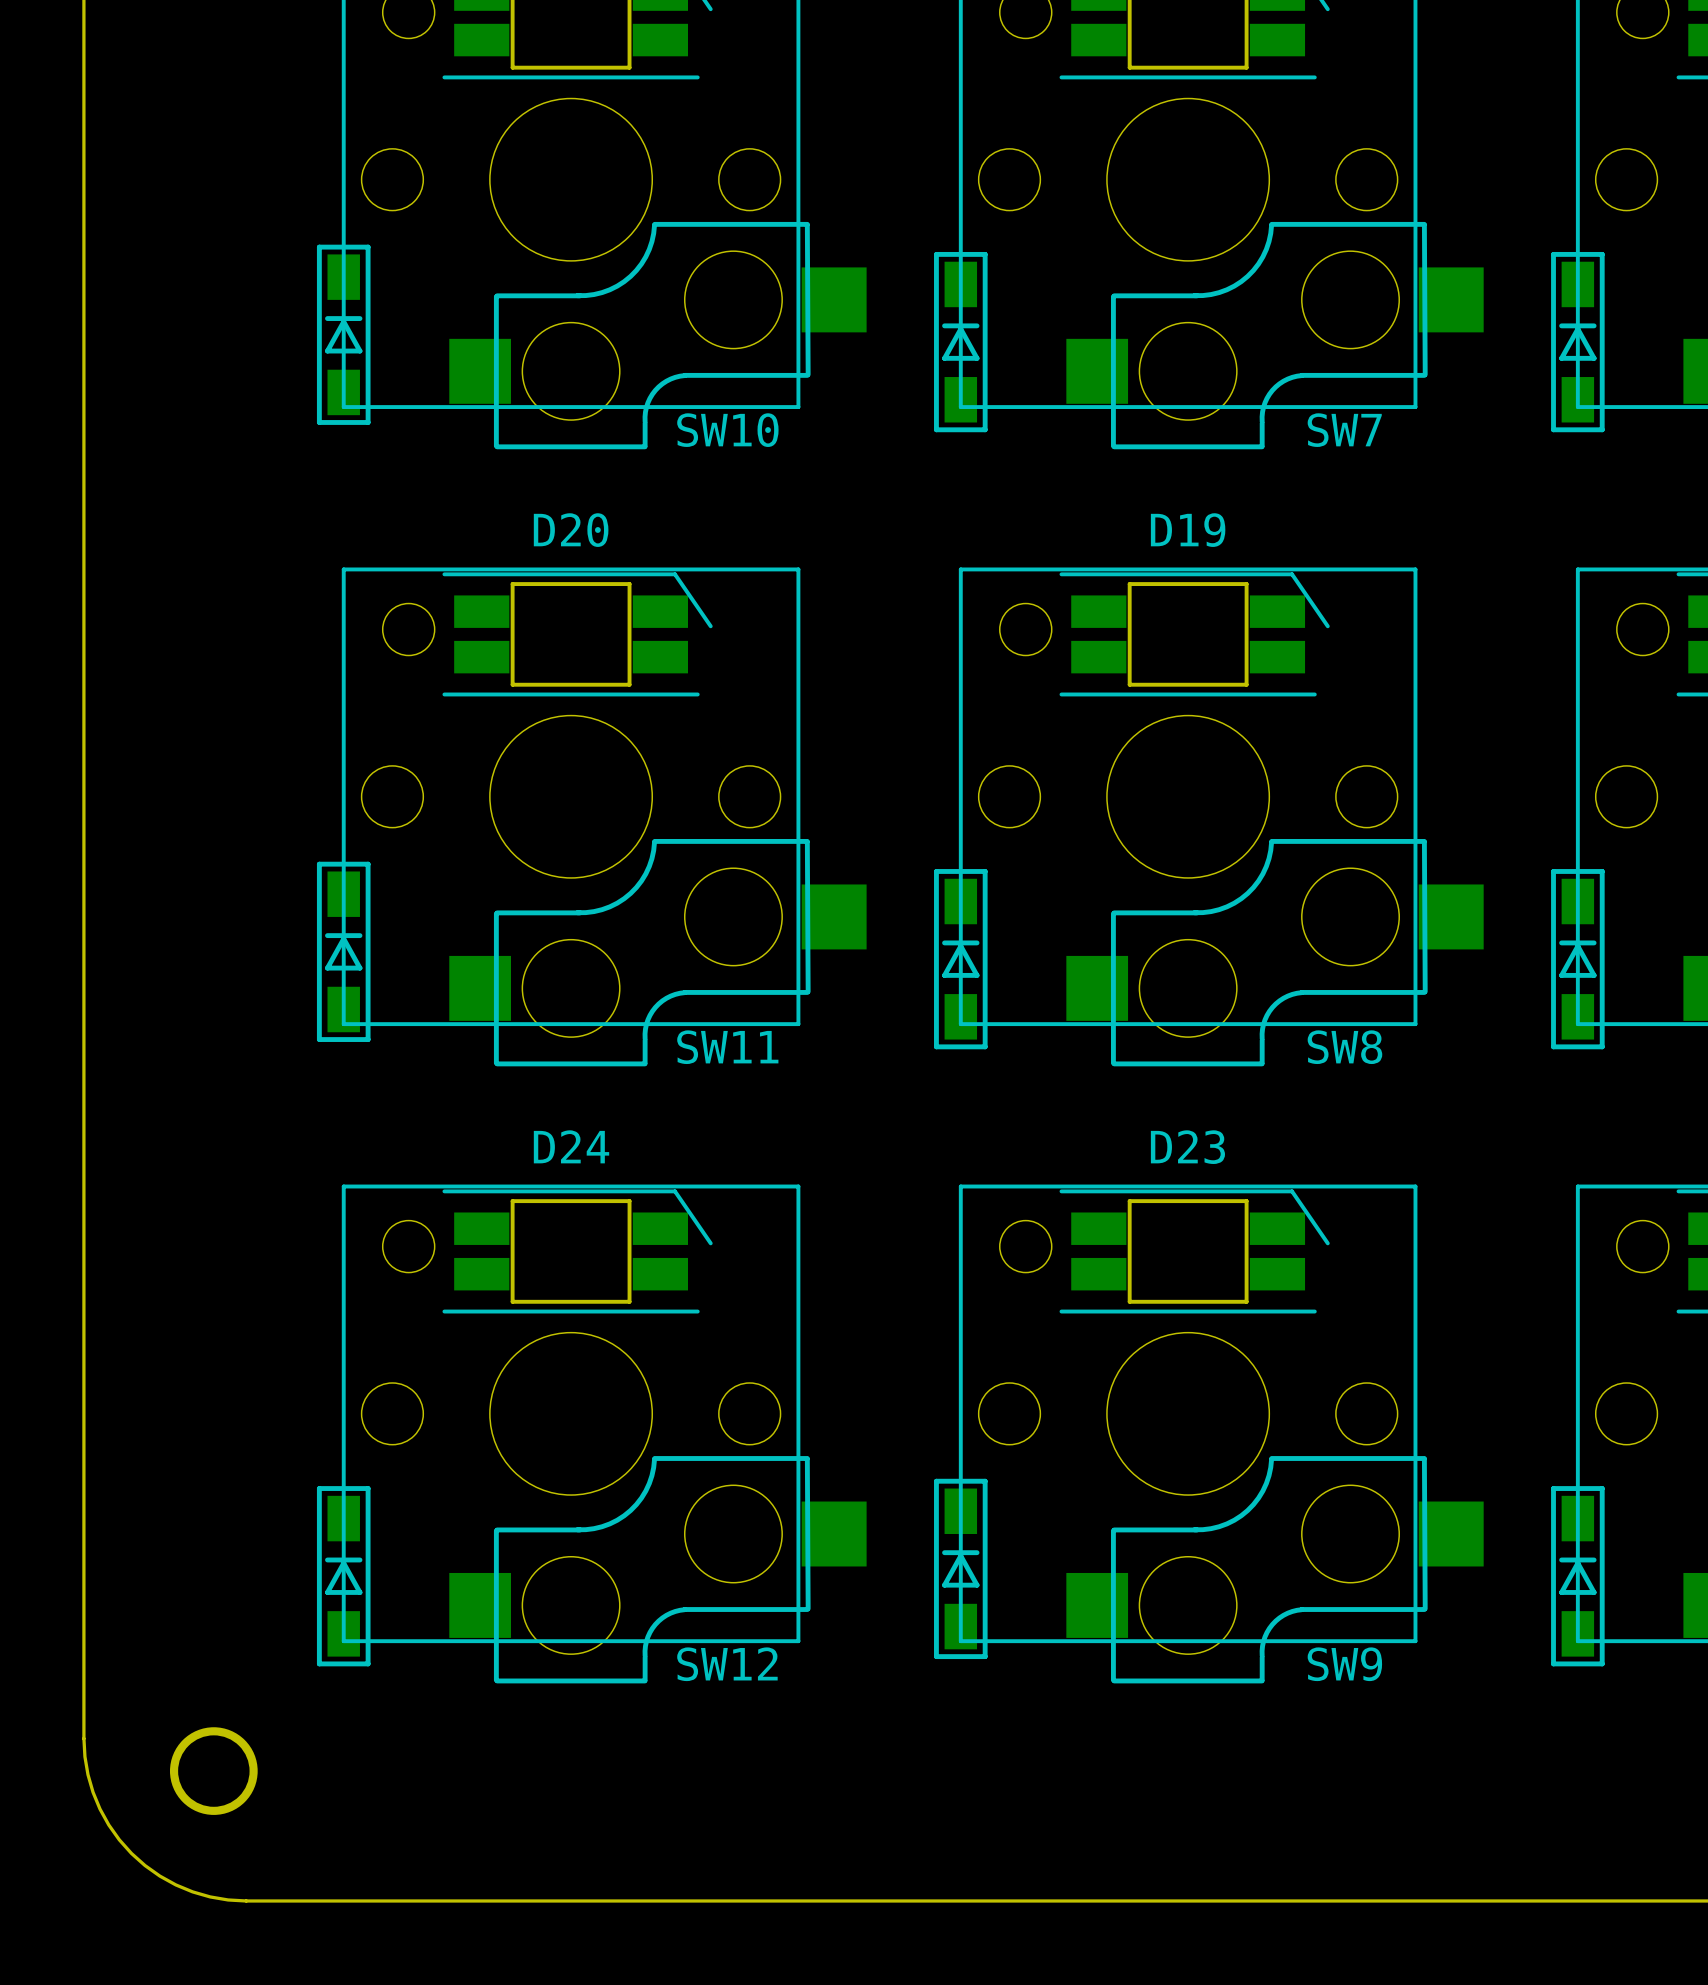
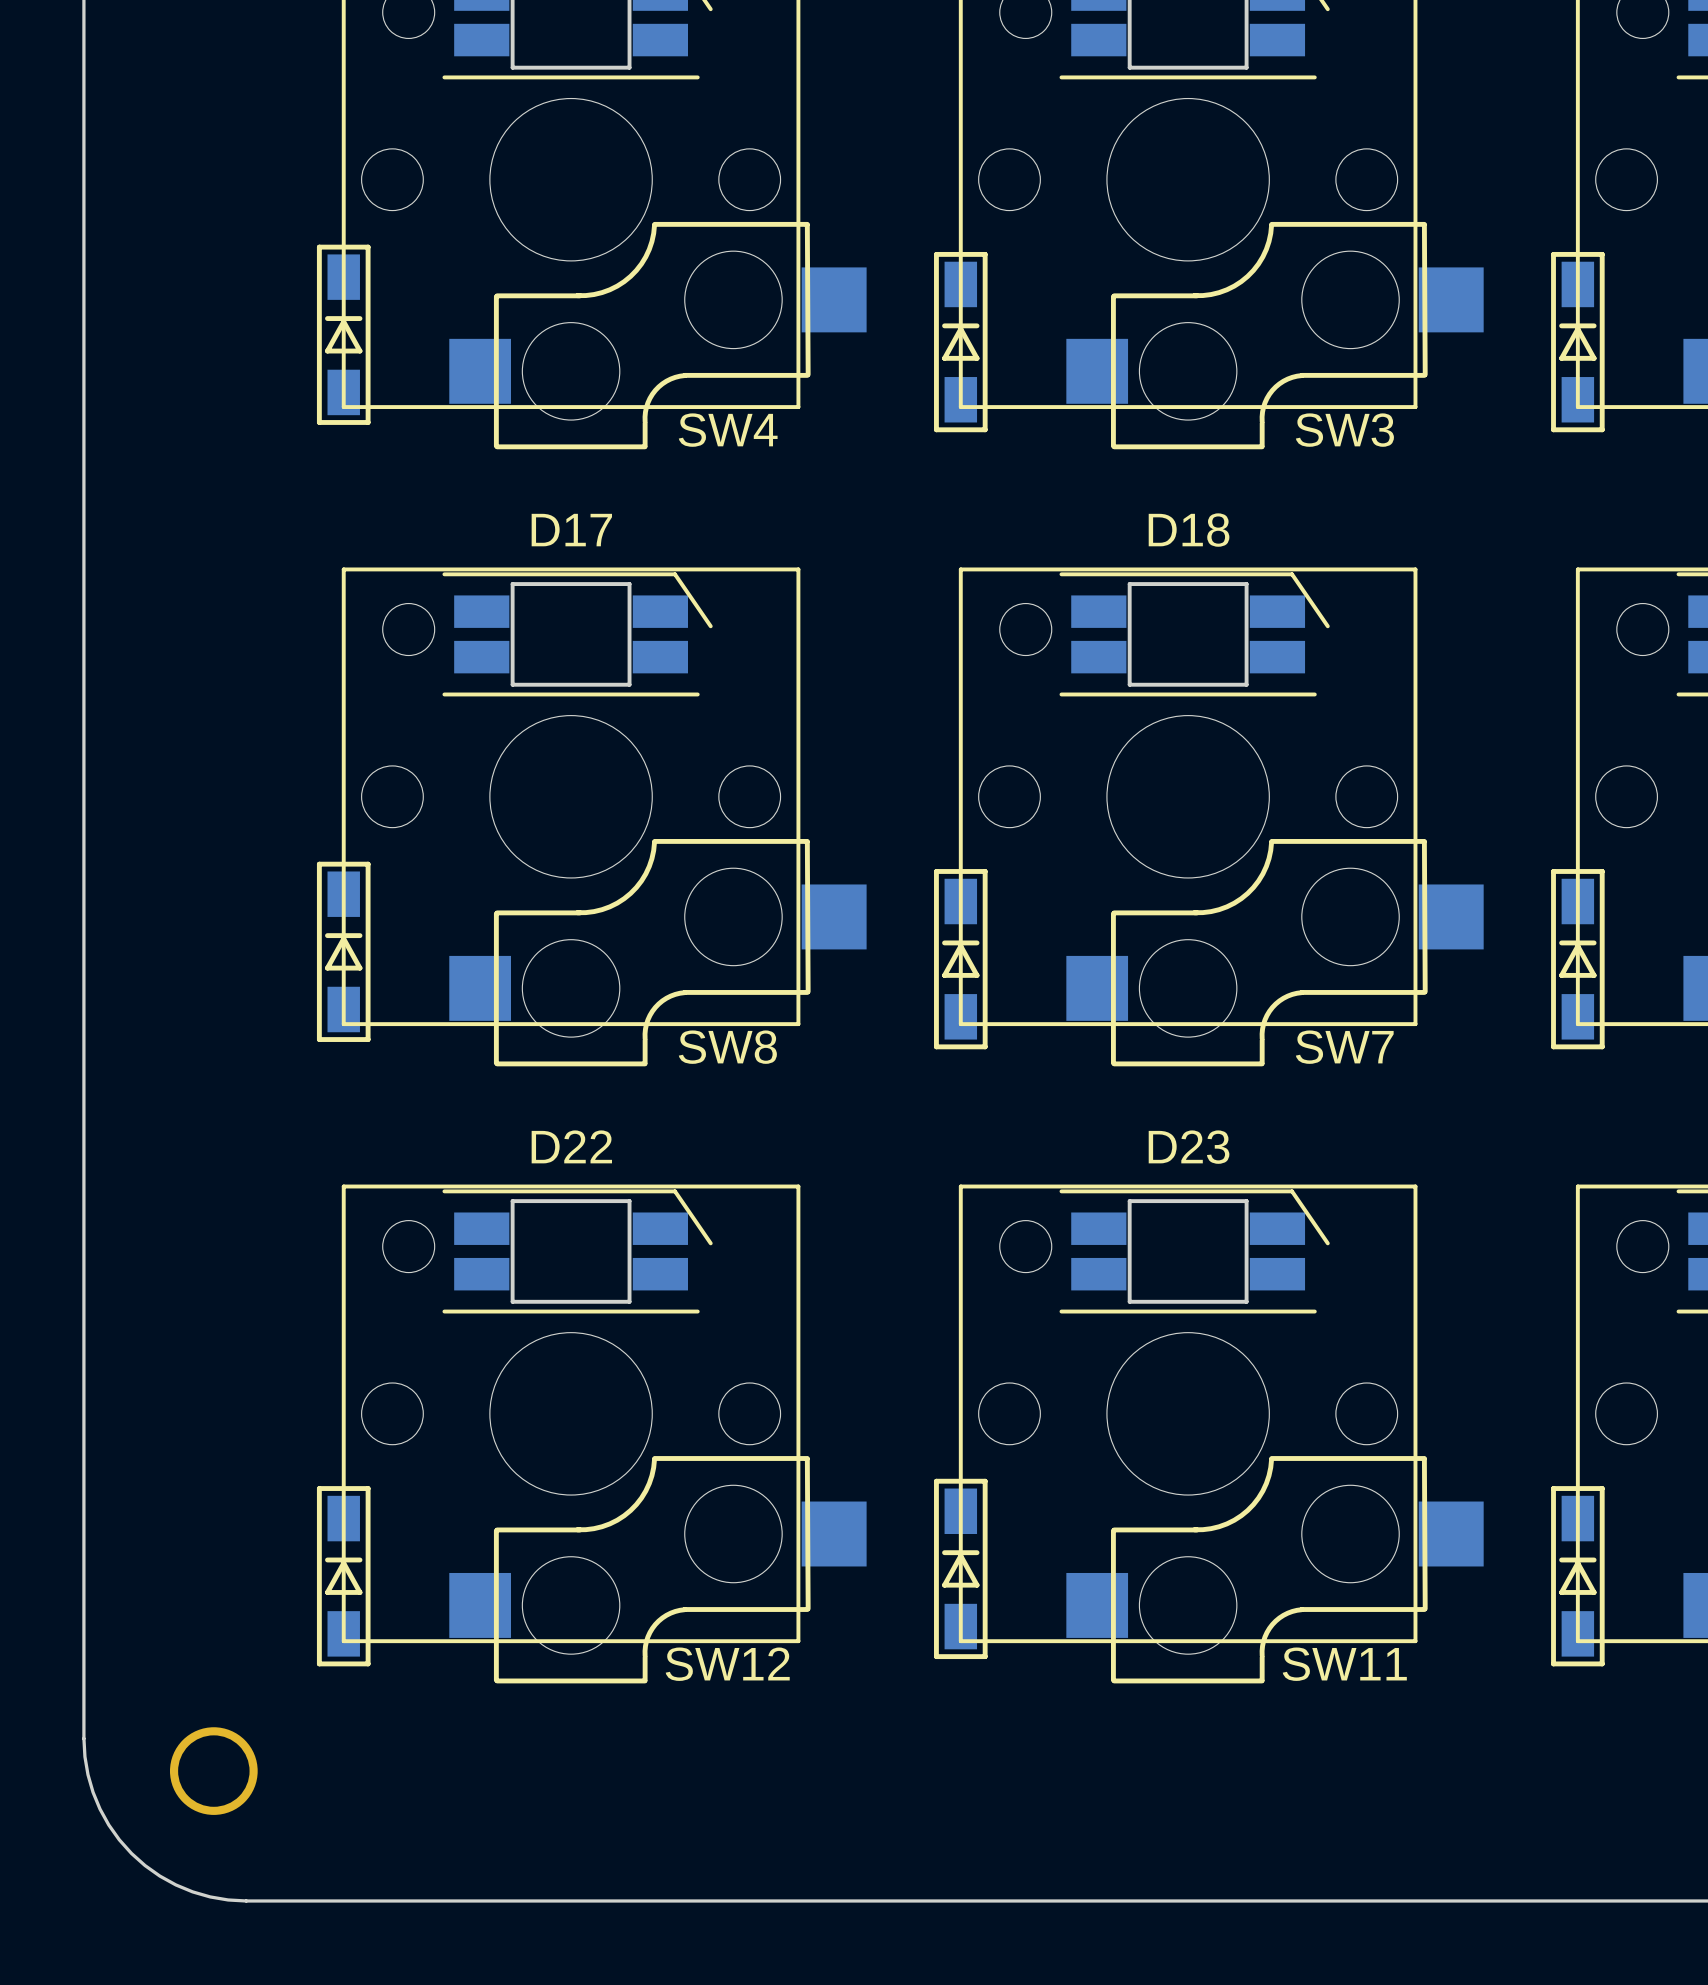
SW10 name: SW10 (727, 430) -> SW4 (728, 430)
SW7 name: SW7 (1344, 430) -> SW3 (1344, 430)
D20 name: D20 (571, 530) -> D17 (571, 530)
D19 name: D19 (1188, 530) -> D18 (1189, 530)
SW11 name: SW11 (727, 1047) -> SW8 (727, 1047)
SW8 name: SW8 (1344, 1047) -> SW7 (1344, 1047)
D24 name: D24 (571, 1146) -> D22 (571, 1146)
SW9 name: SW9 (1344, 1664) -> SW11 (1344, 1664)

